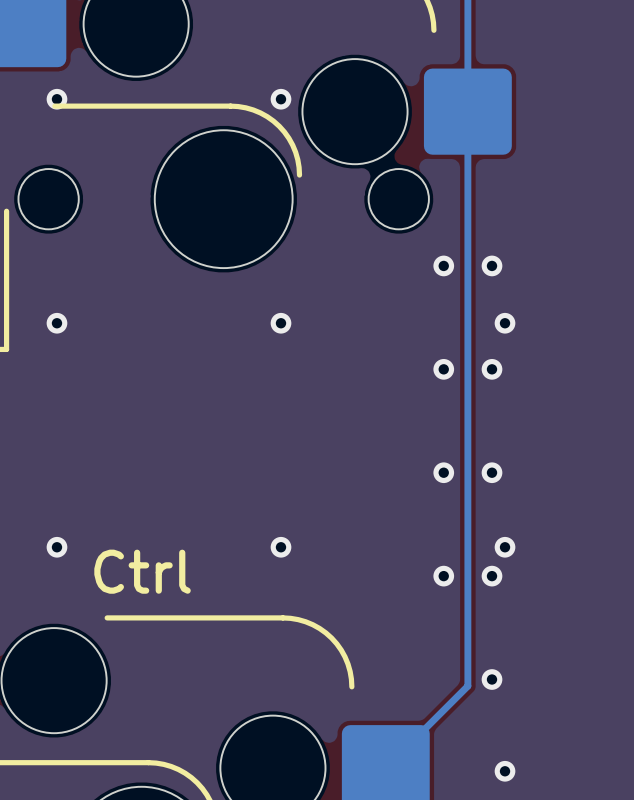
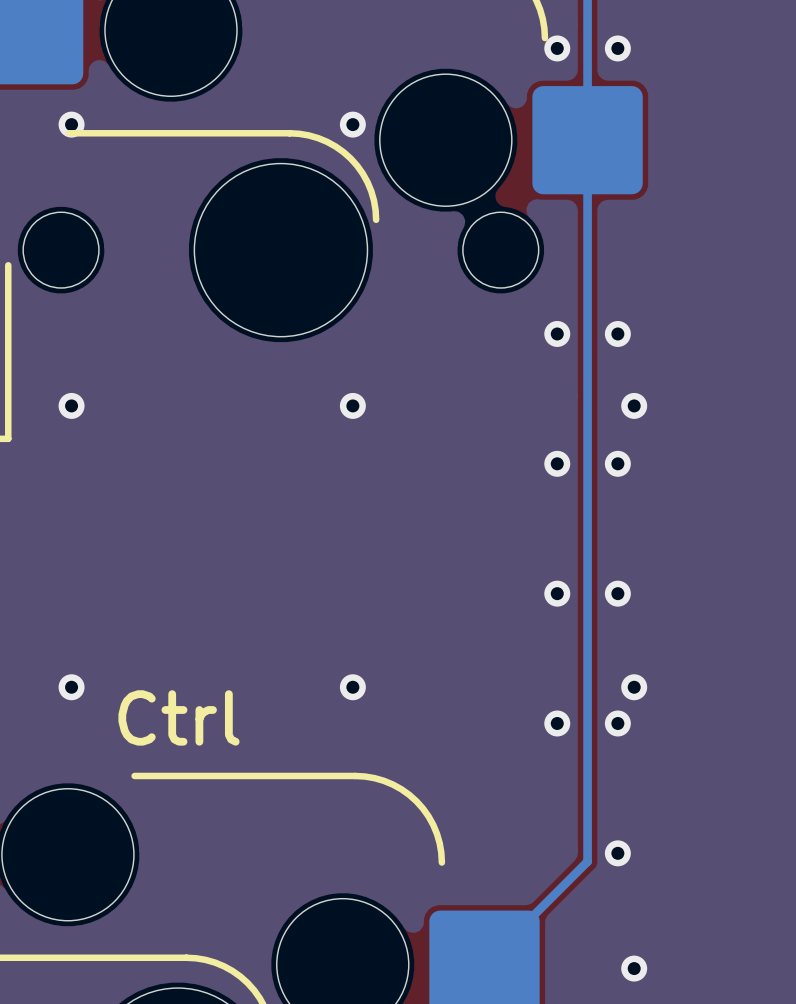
via: none -> (557, 48)
via: none -> (617, 48)

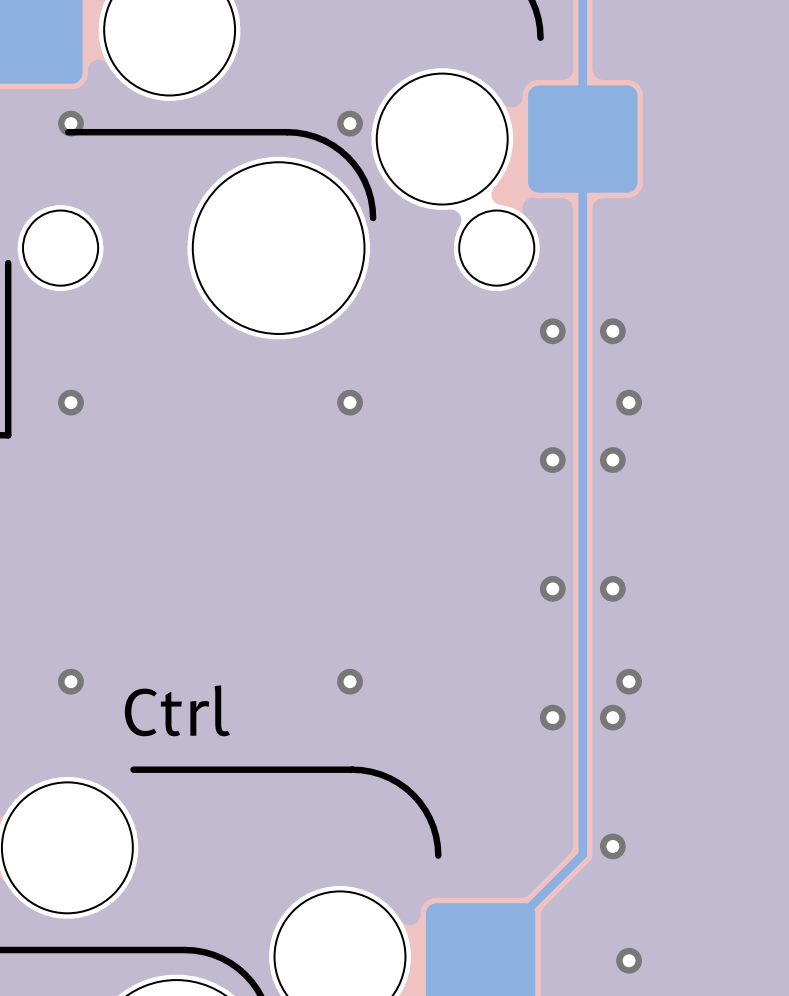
via: (557, 48) -> none
via: (617, 48) -> none

